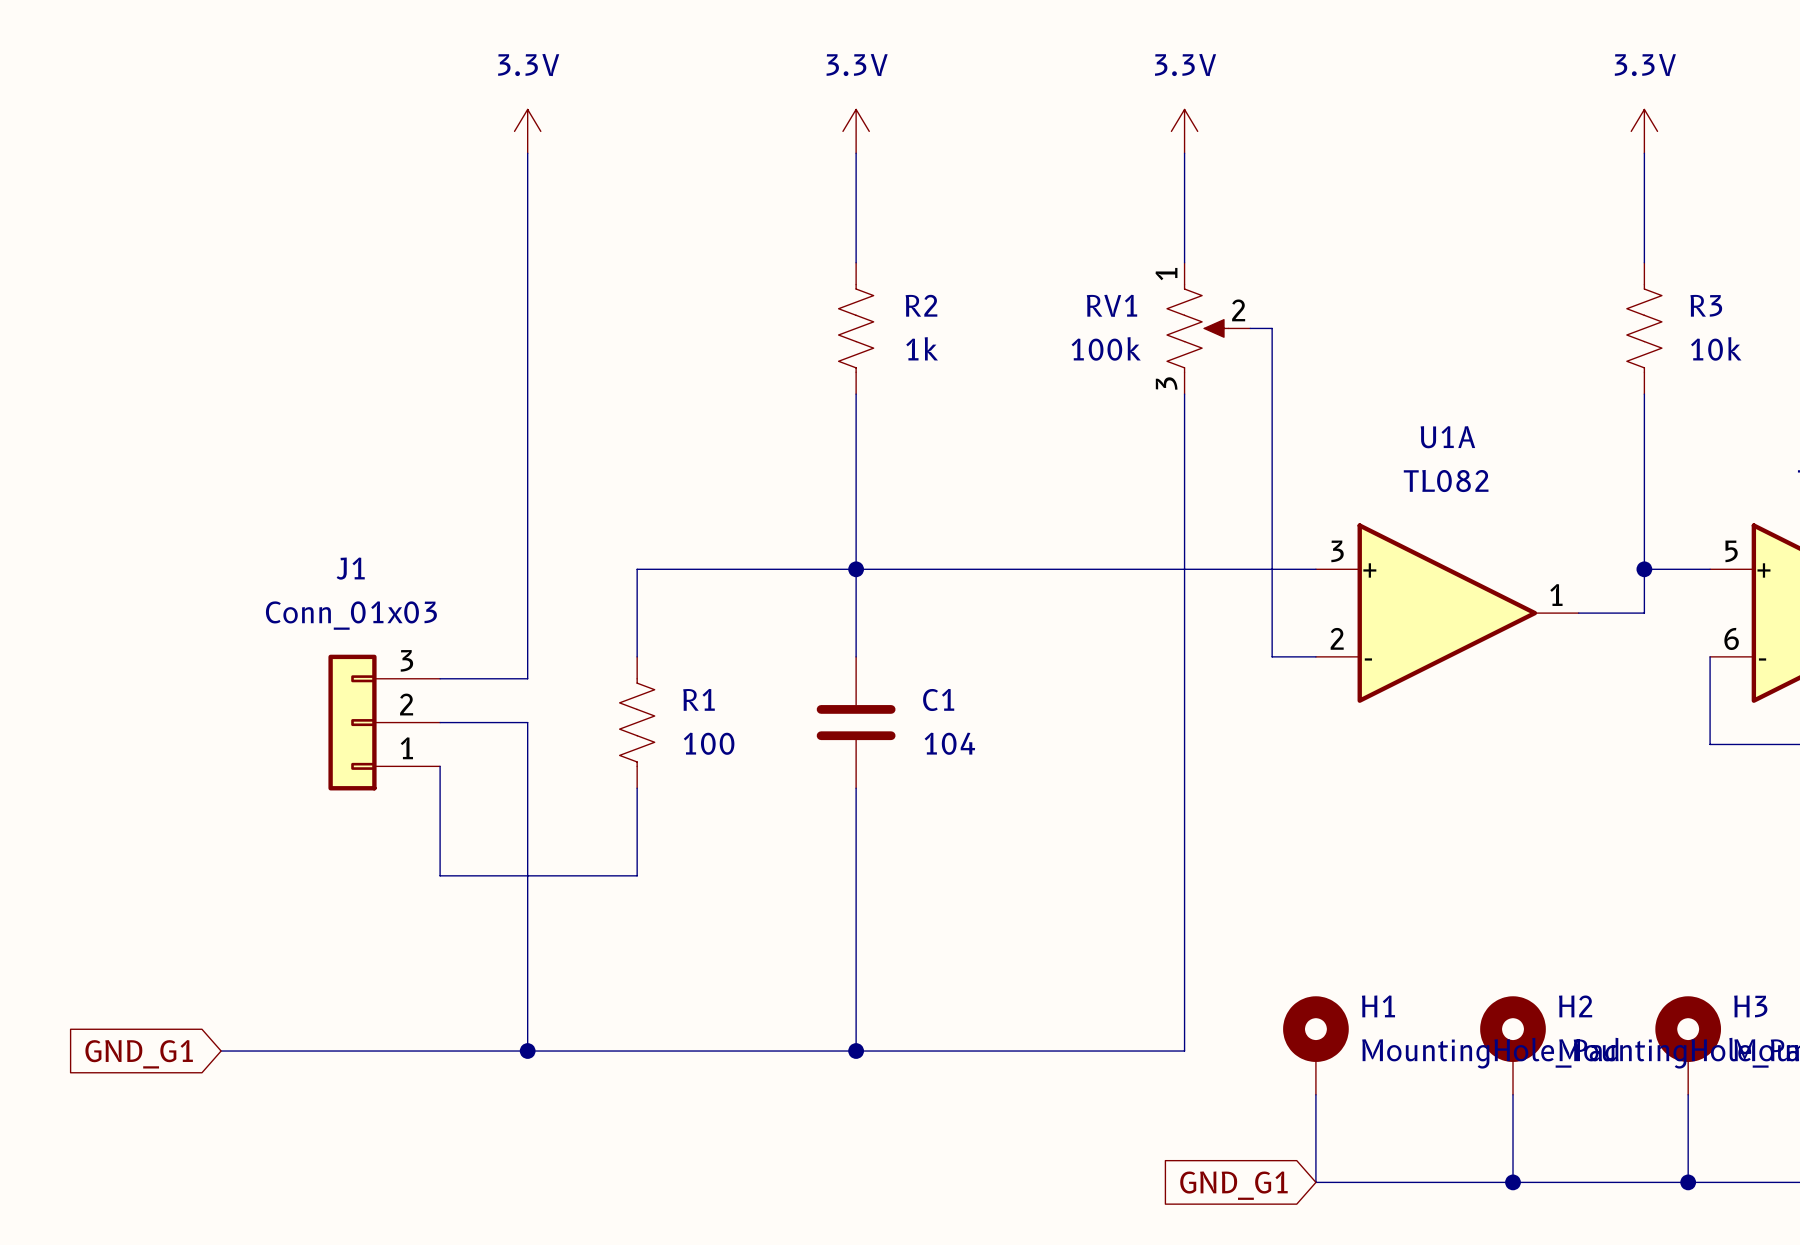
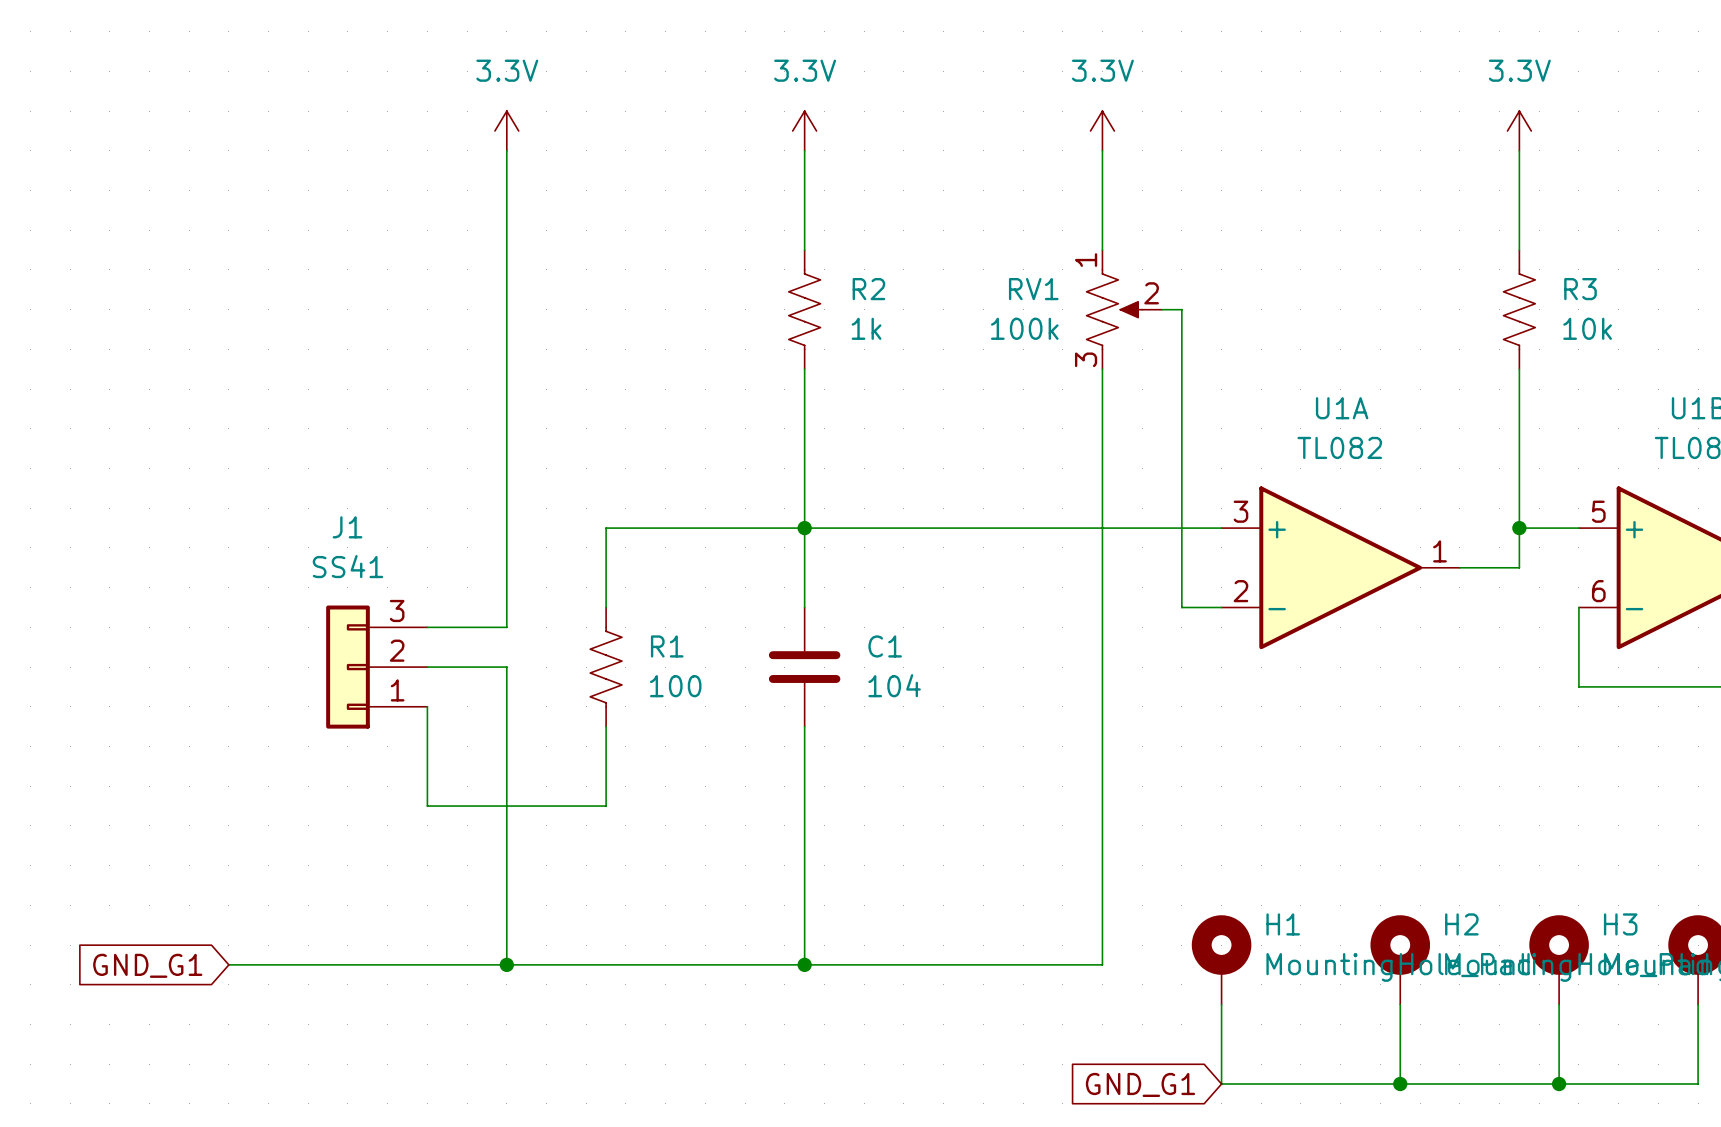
J1 value: Conn_01x03 (351, 615) -> SS41 (347, 566)

